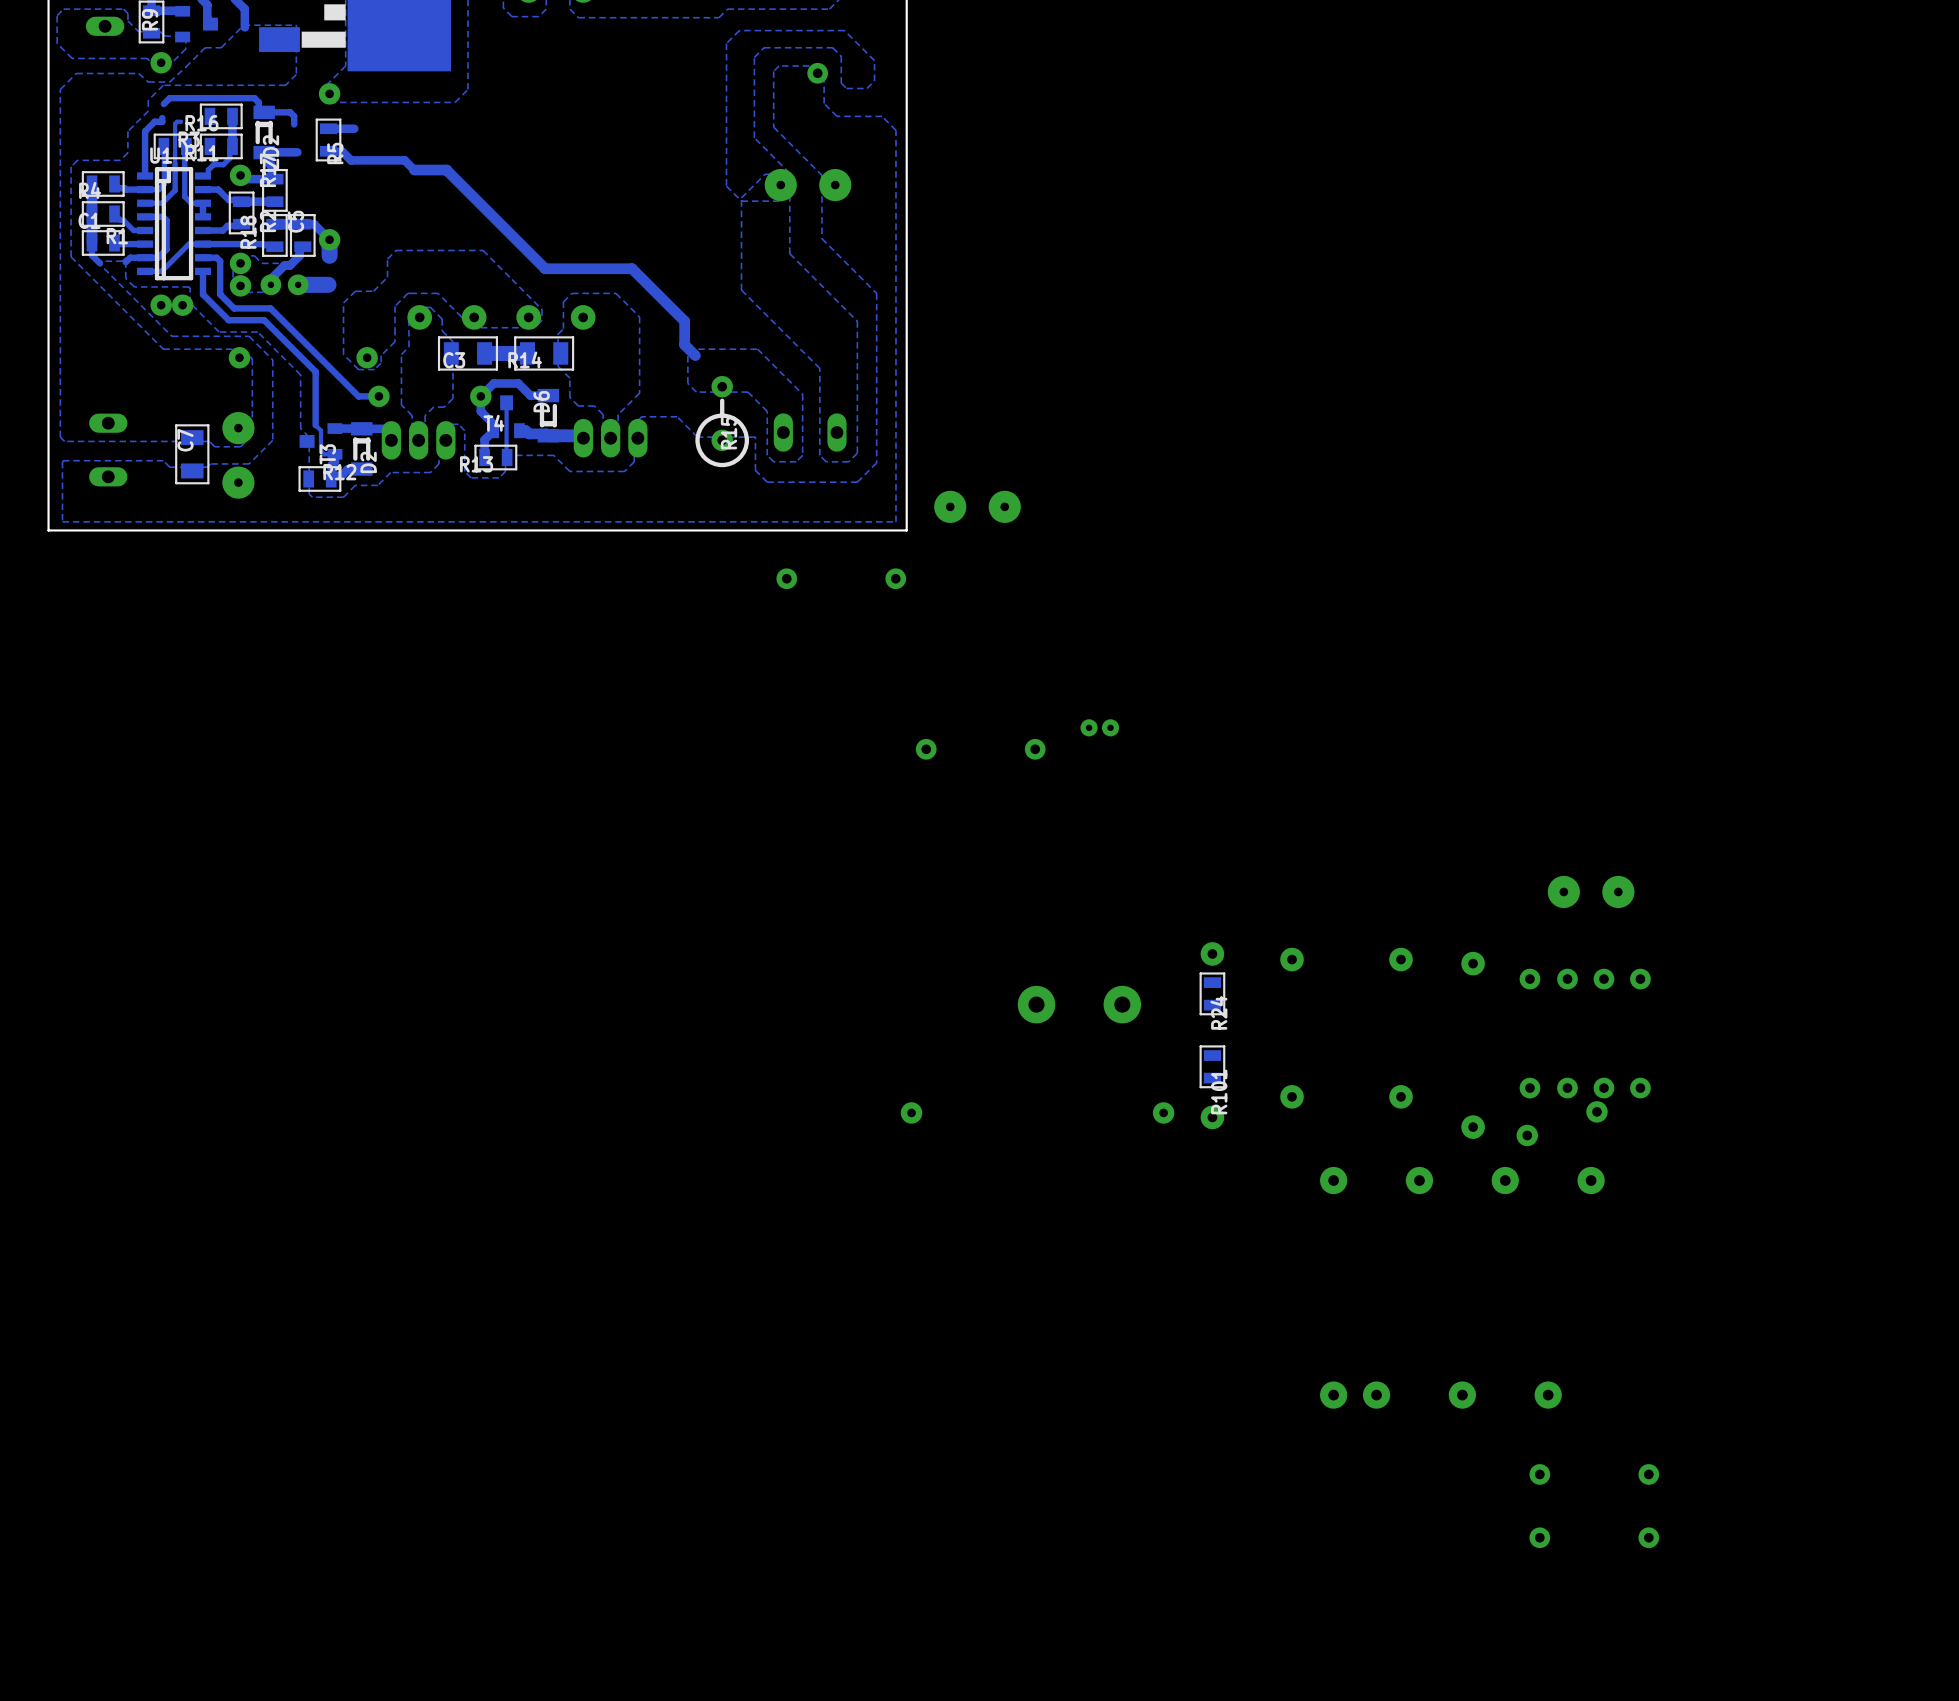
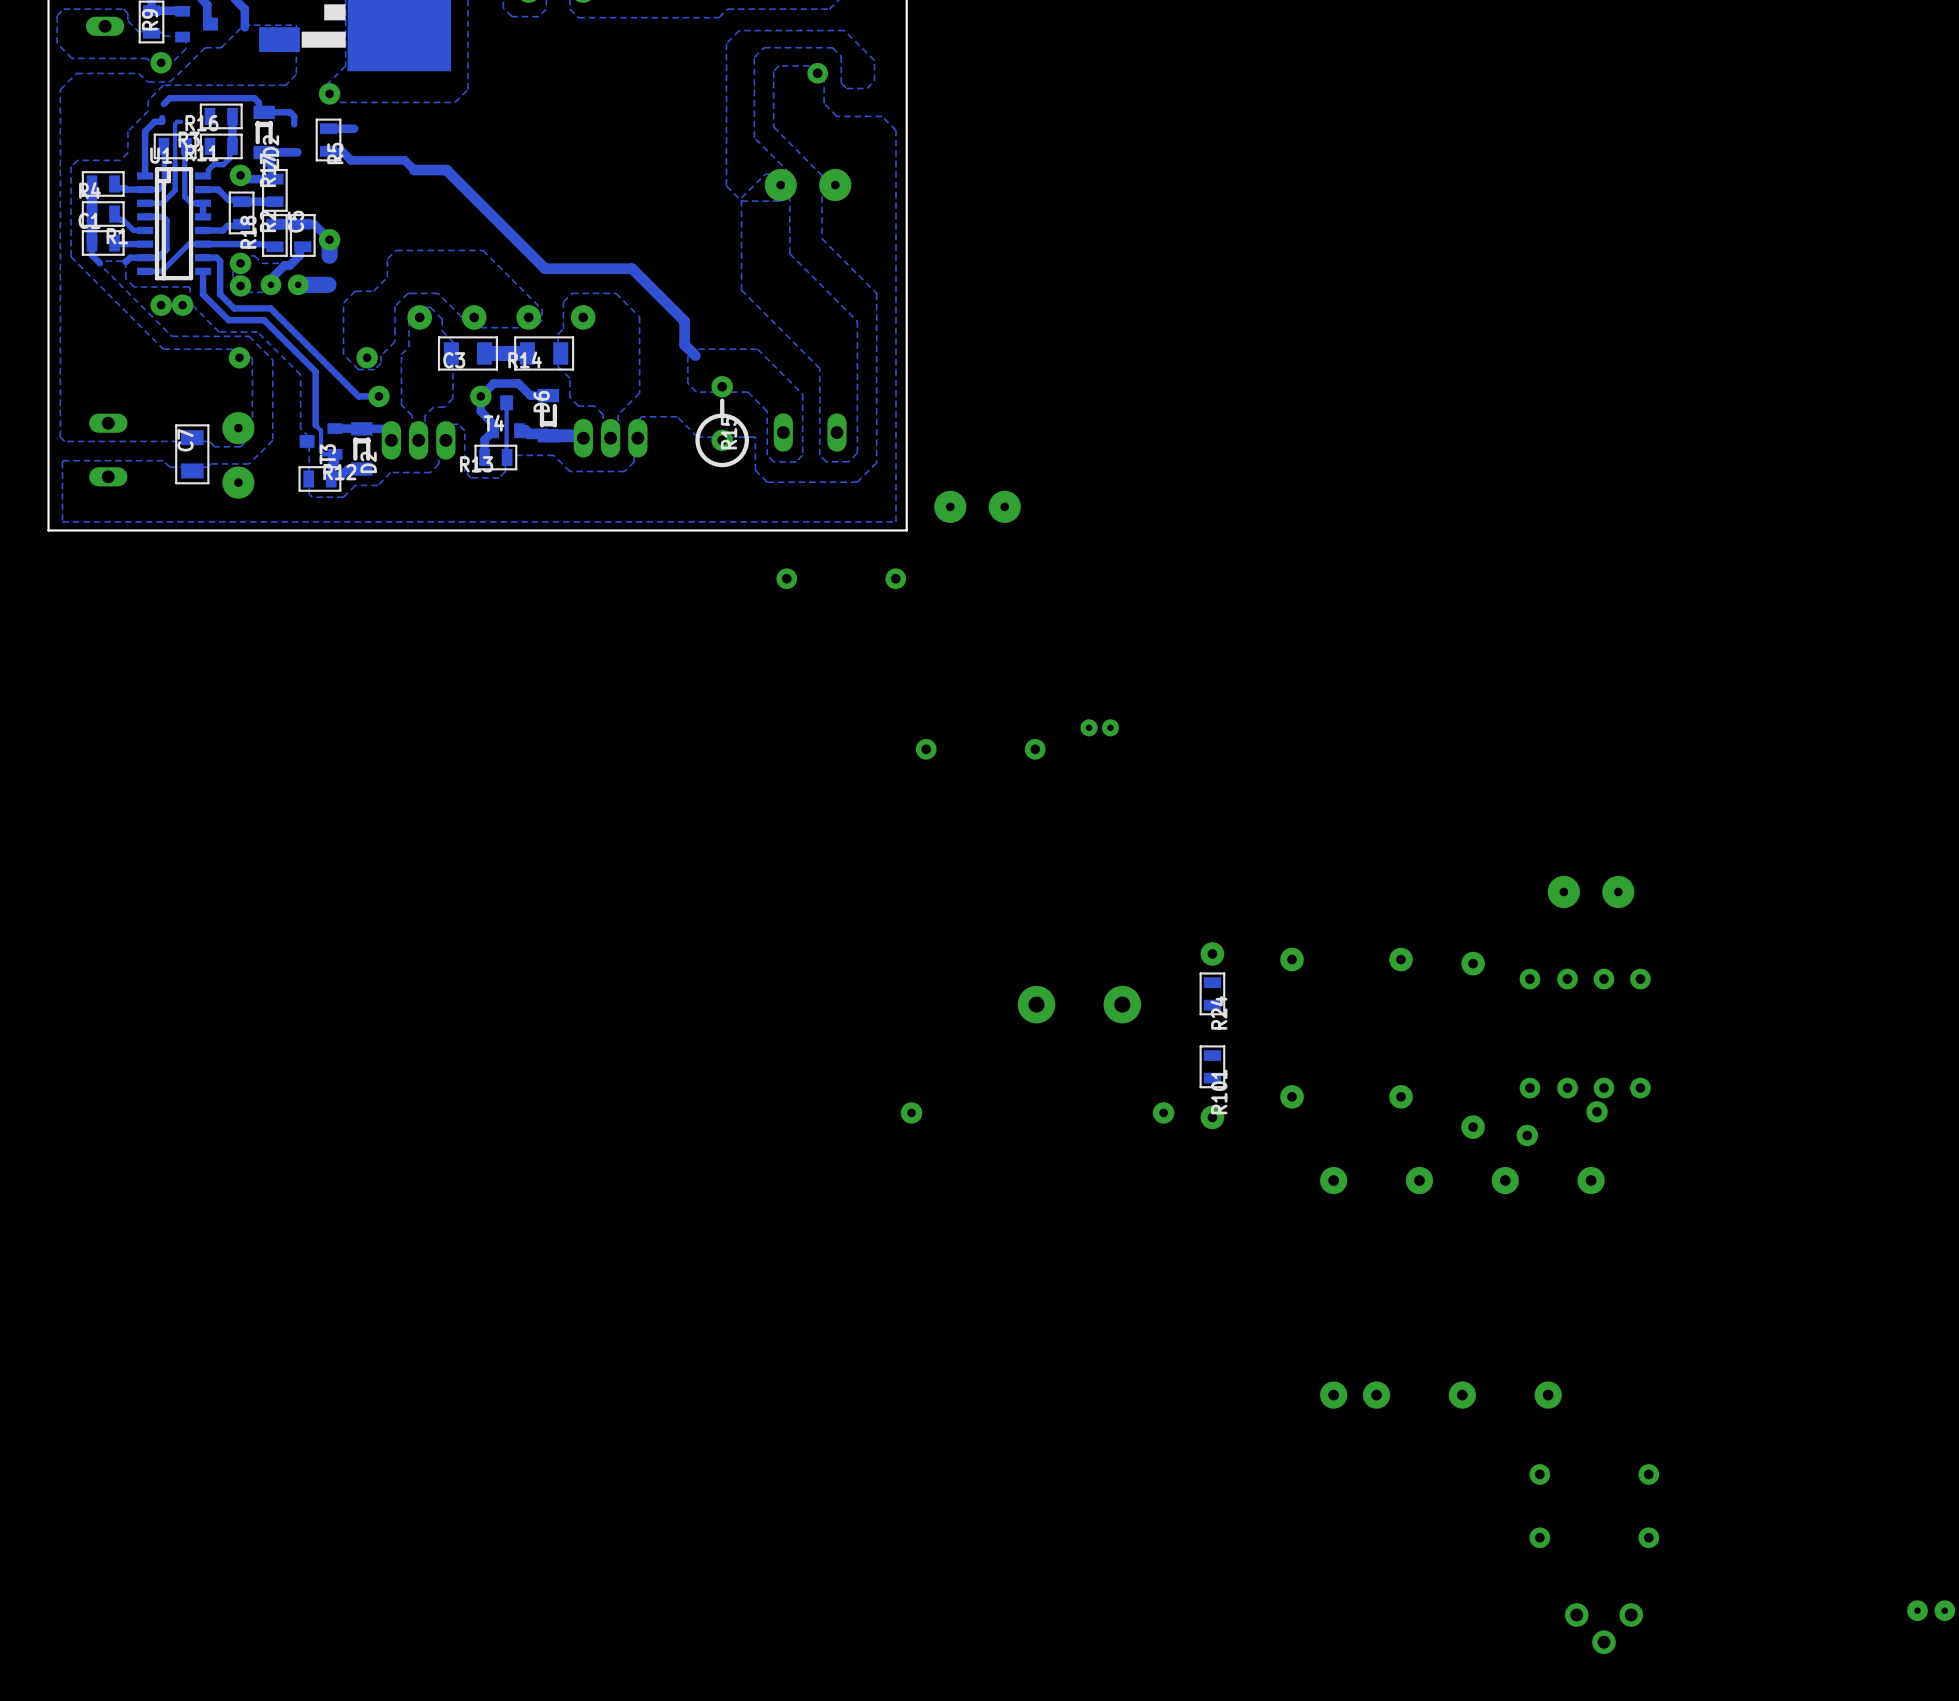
part: none -> (1931, 1610)
part: none -> (1603, 1628)

